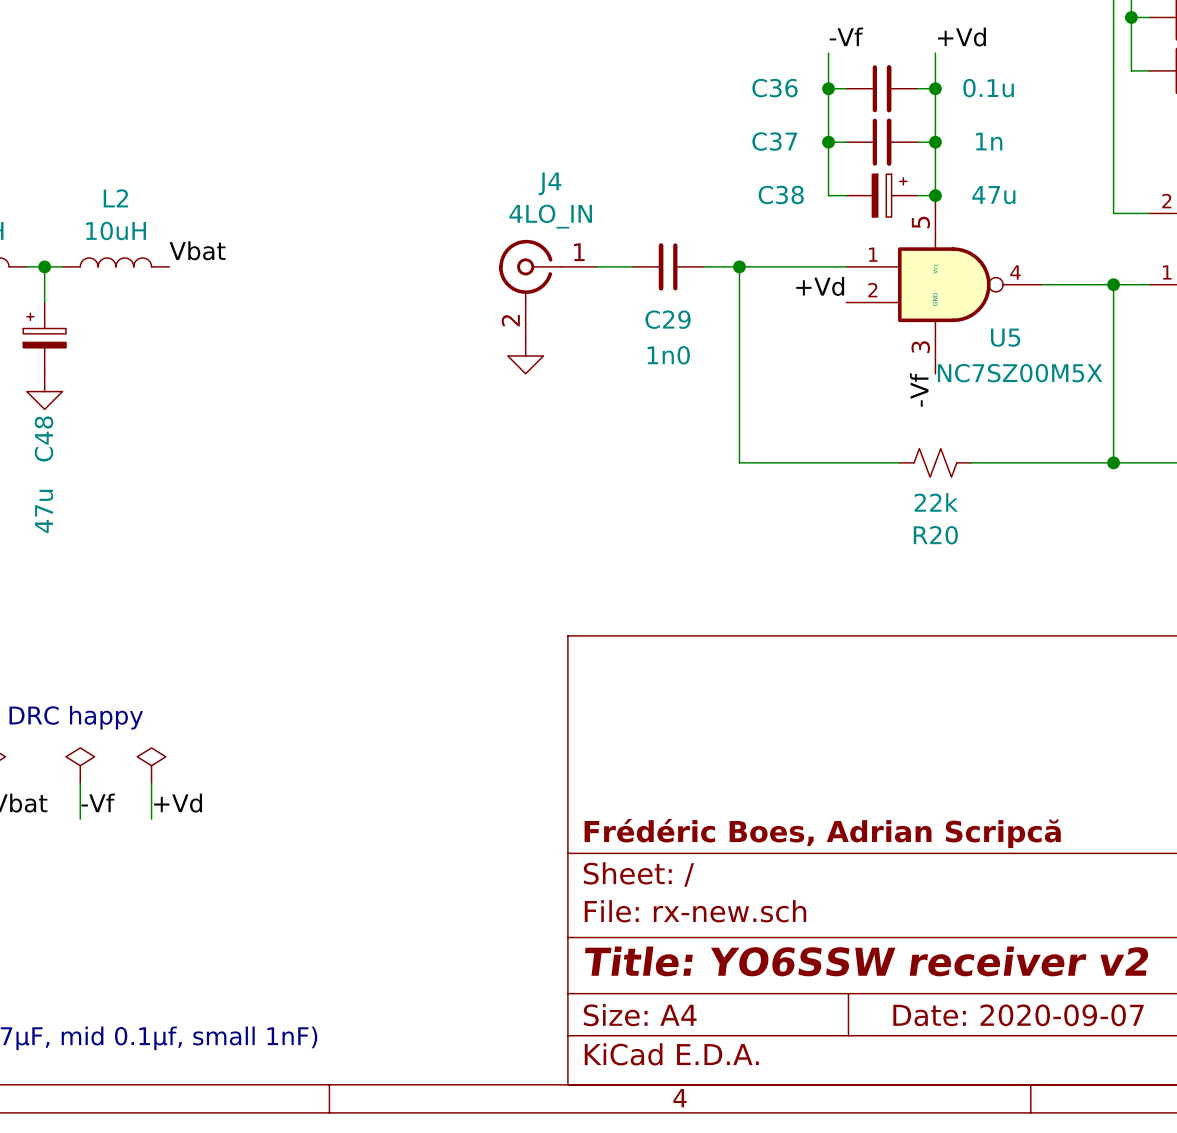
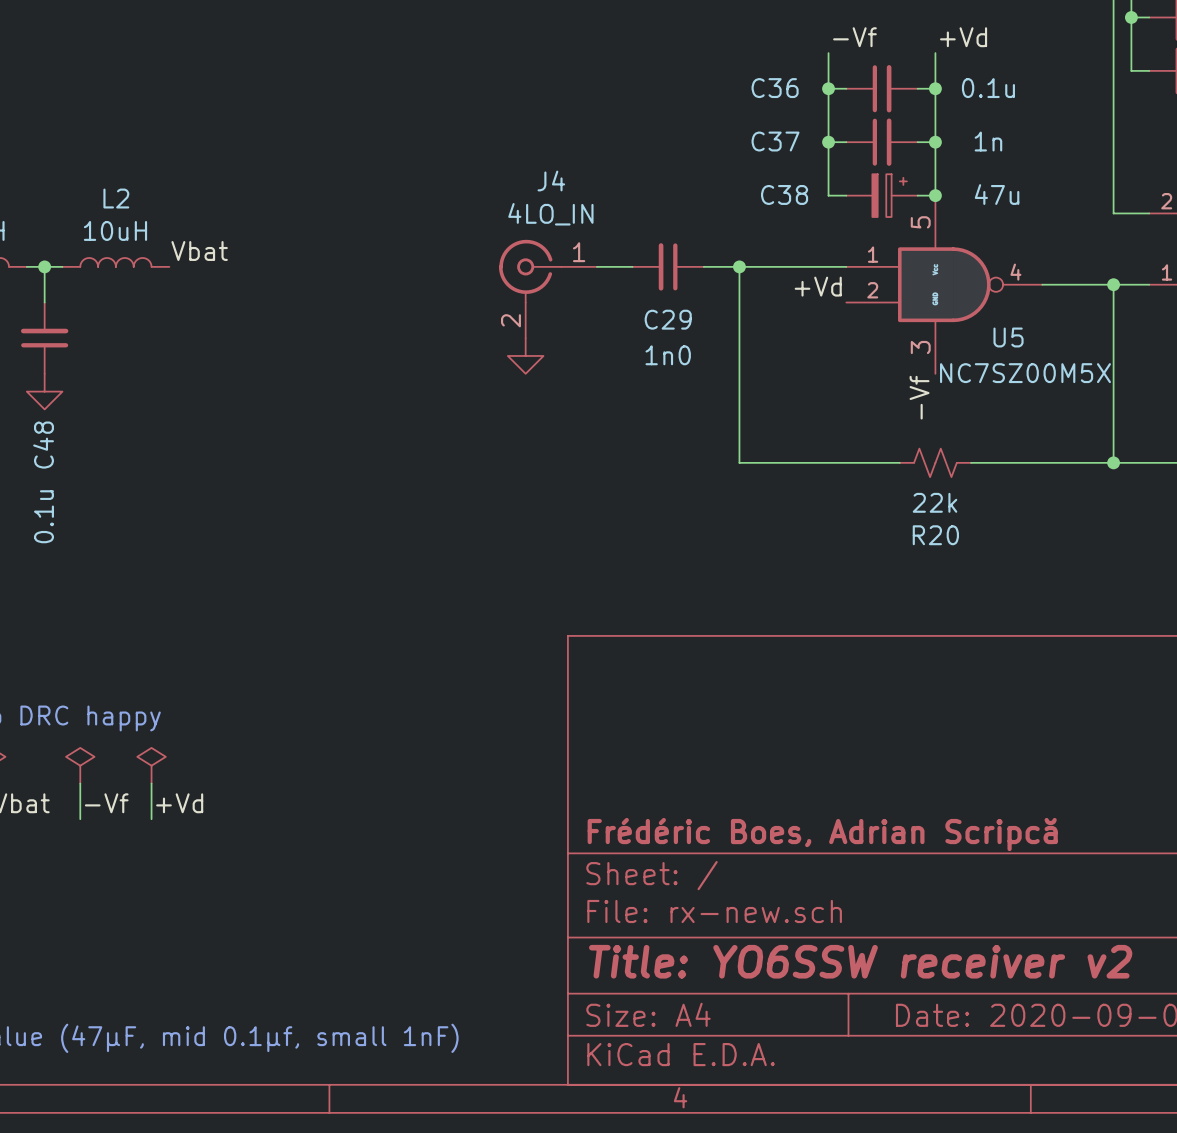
C48 symbol: [23, 302, 67, 374] -> [20, 302, 69, 374]
C48 value: 47u (44, 511) -> 0.1u (43, 516)

